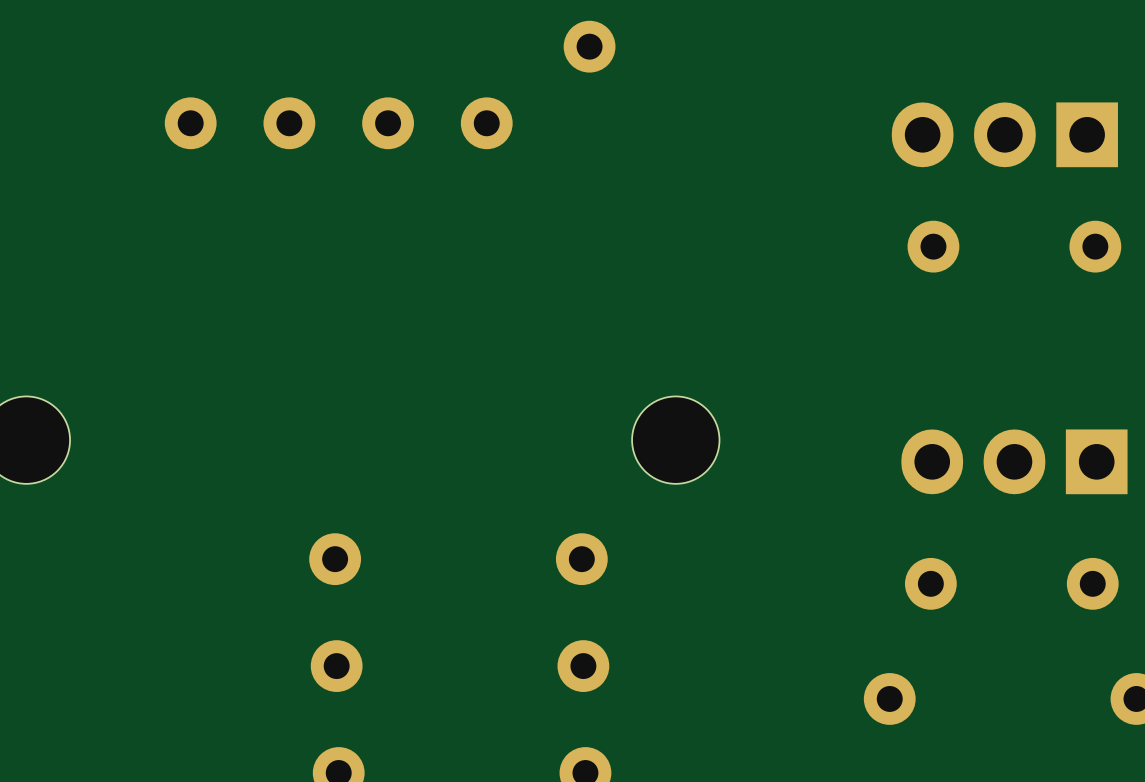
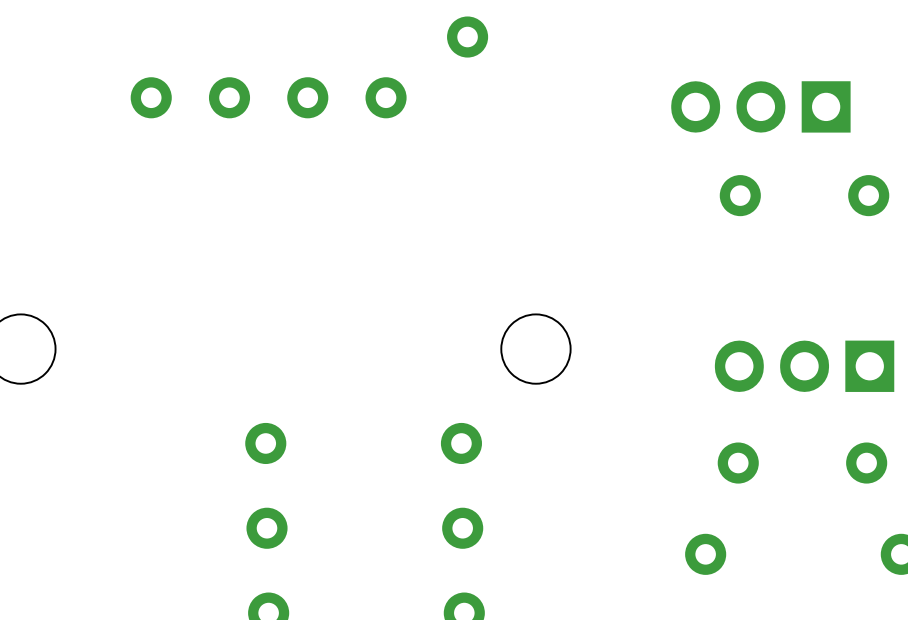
part position: (1004, 134) -> (760, 106)

